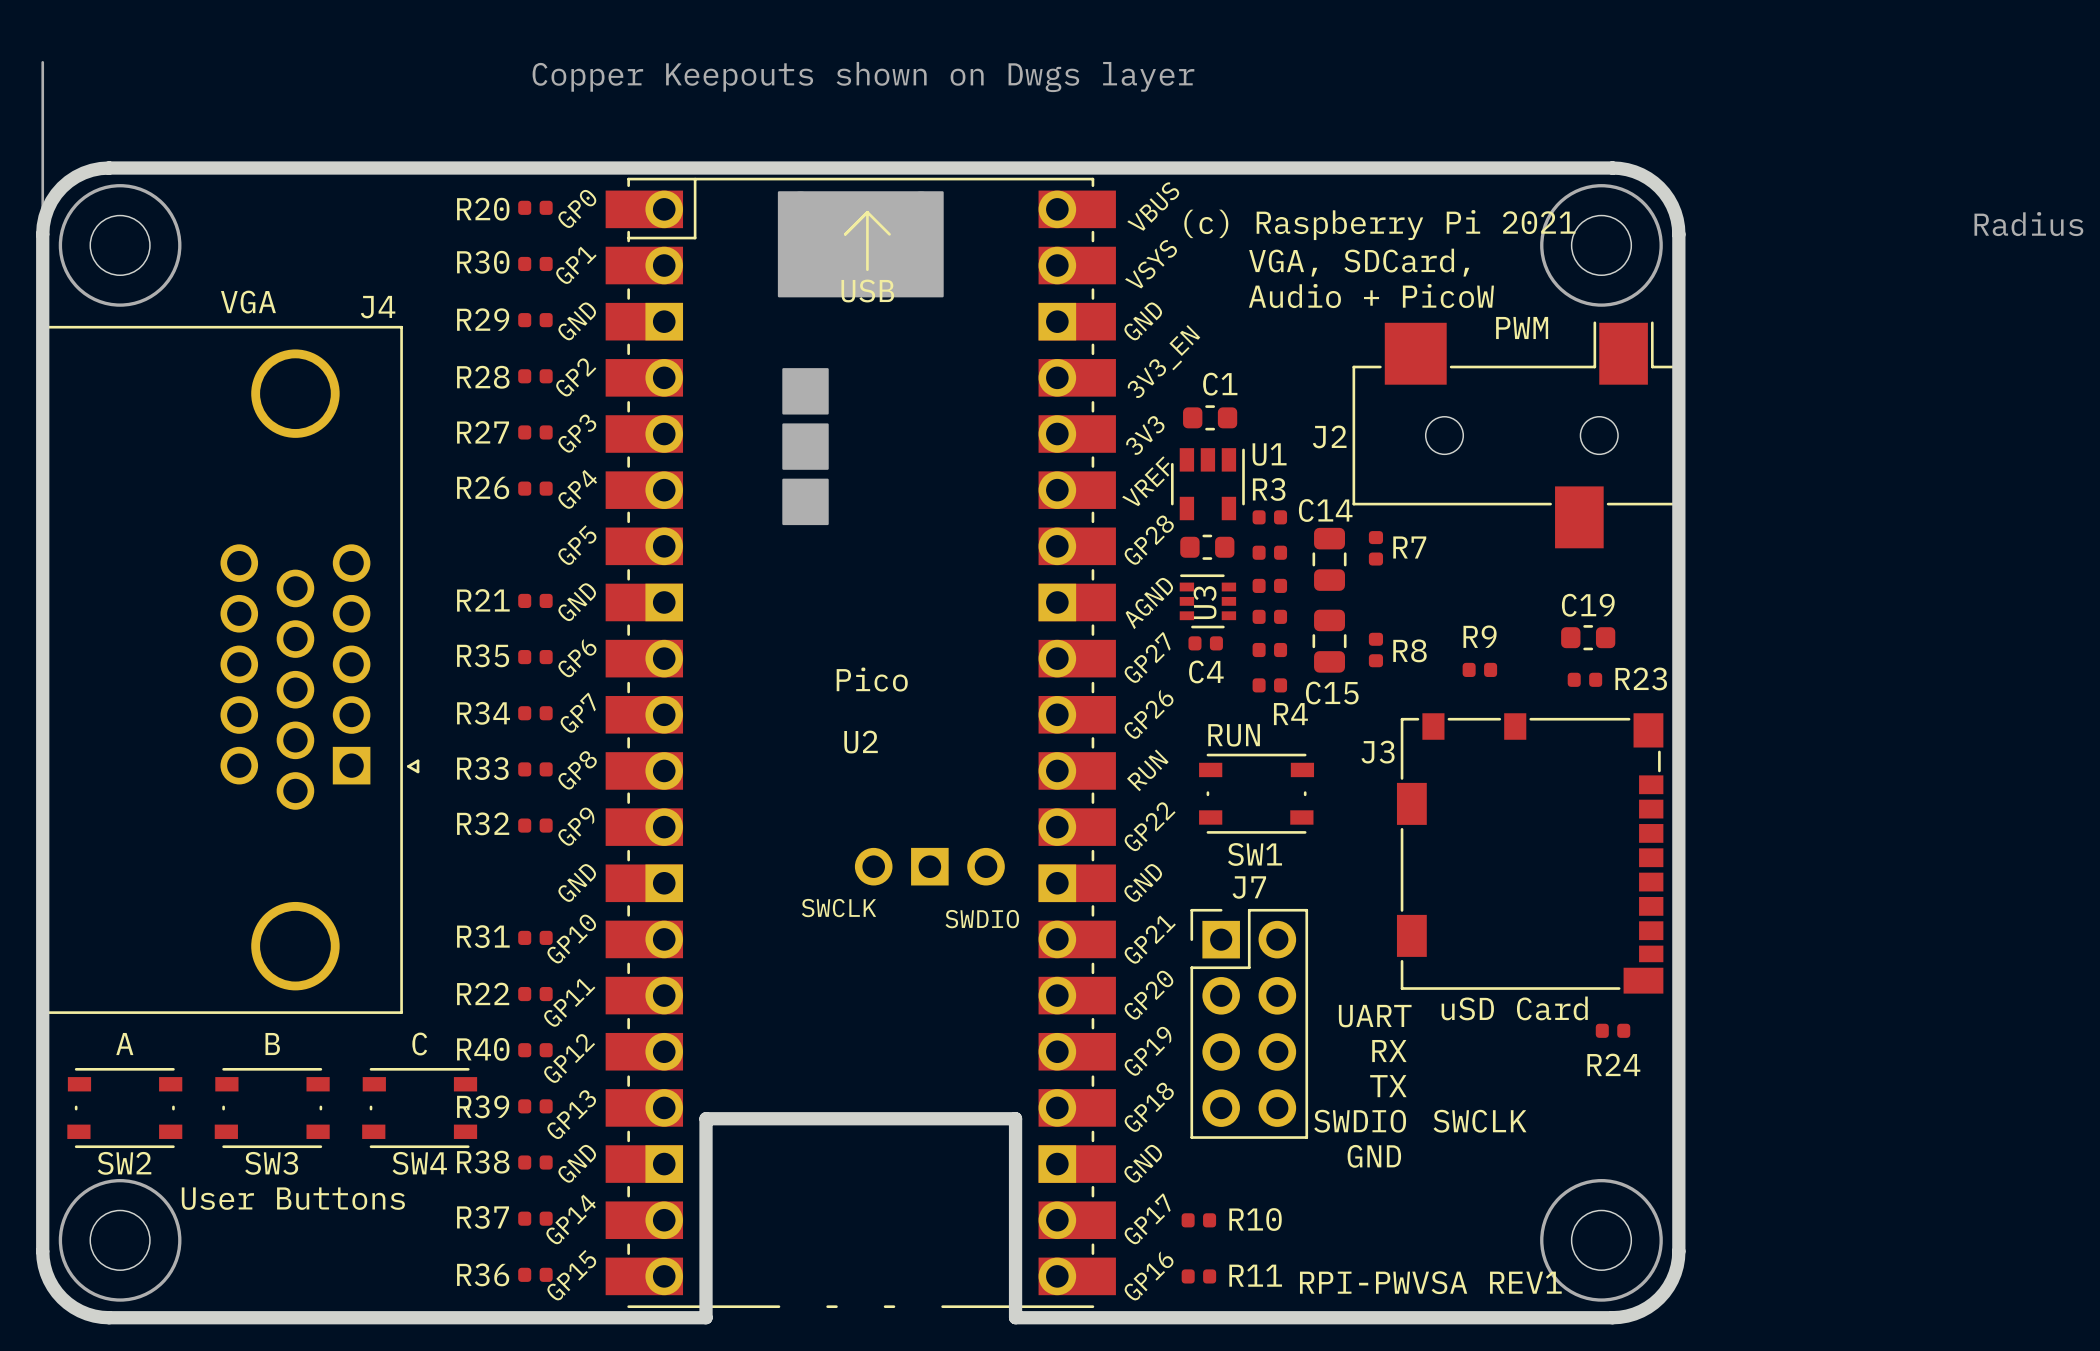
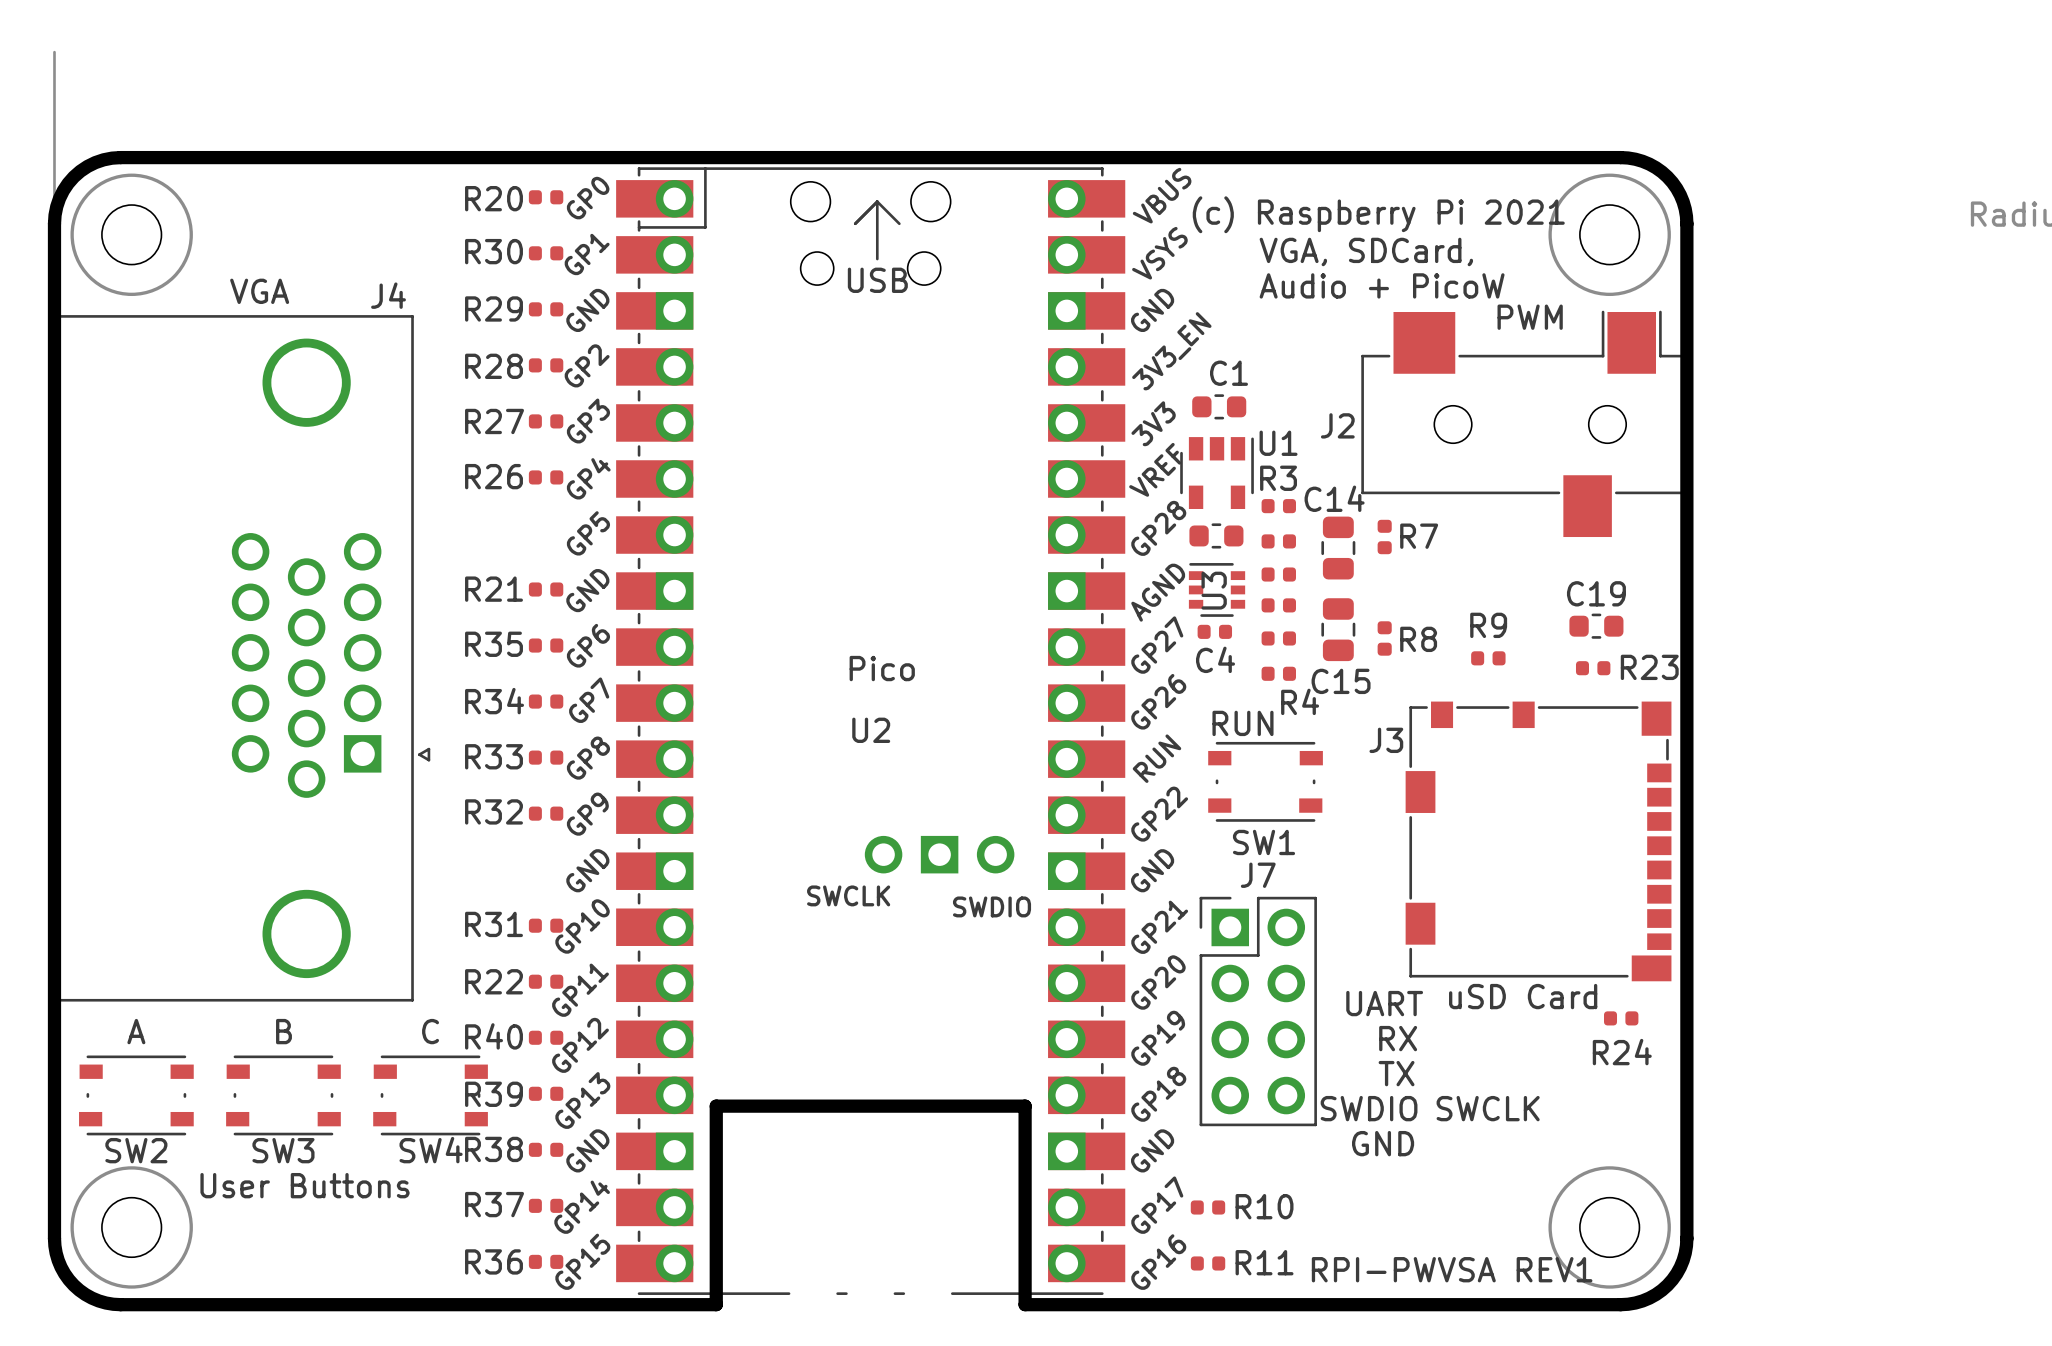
U2 footprint: [605, 177, 1116, 1309] -> [616, 167, 1126, 1295]

